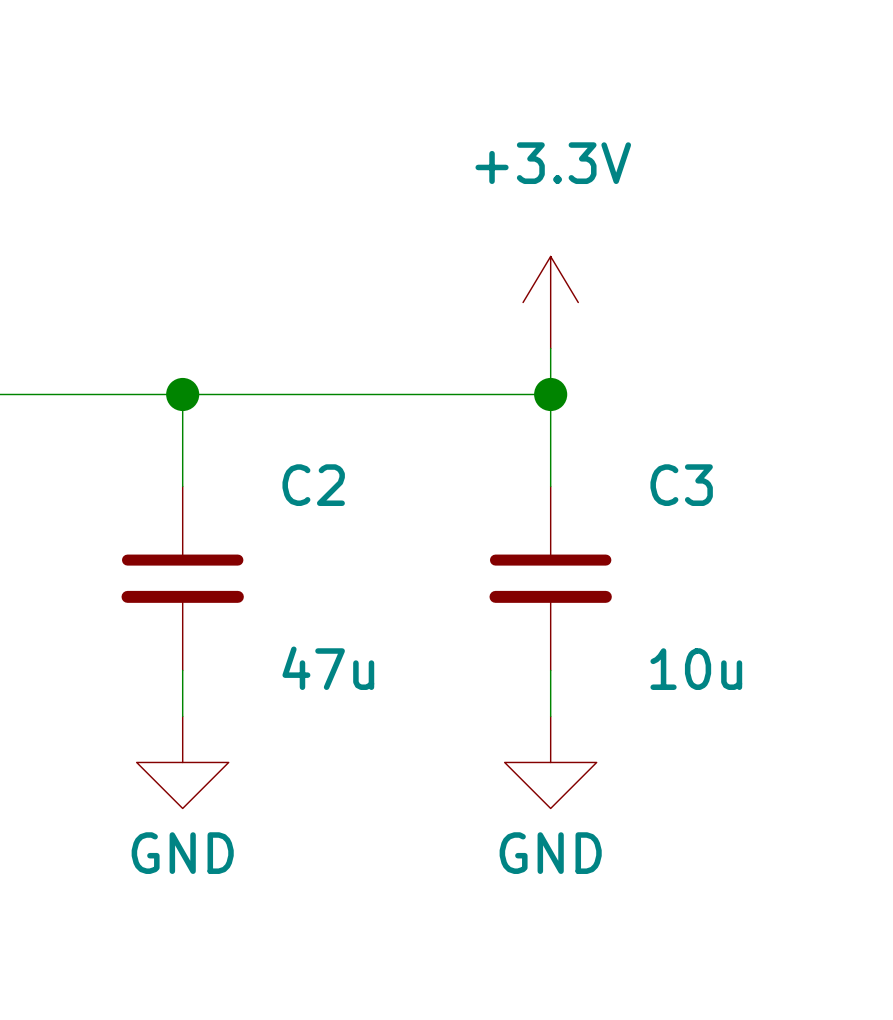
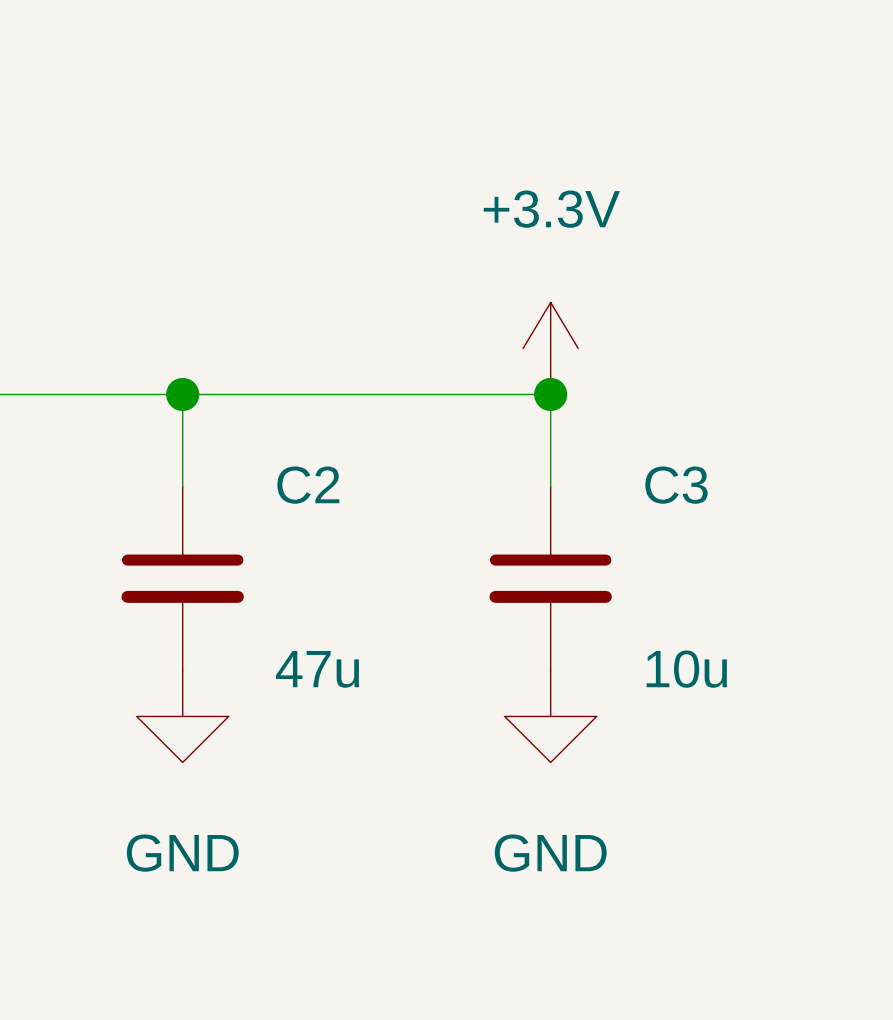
power symbol position: +3.3V (550, 302) -> +3.3V (550, 348)
power symbol position: GND (182, 762) -> GND (182, 716)
power symbol position: GND (550, 762) -> GND (550, 716)

